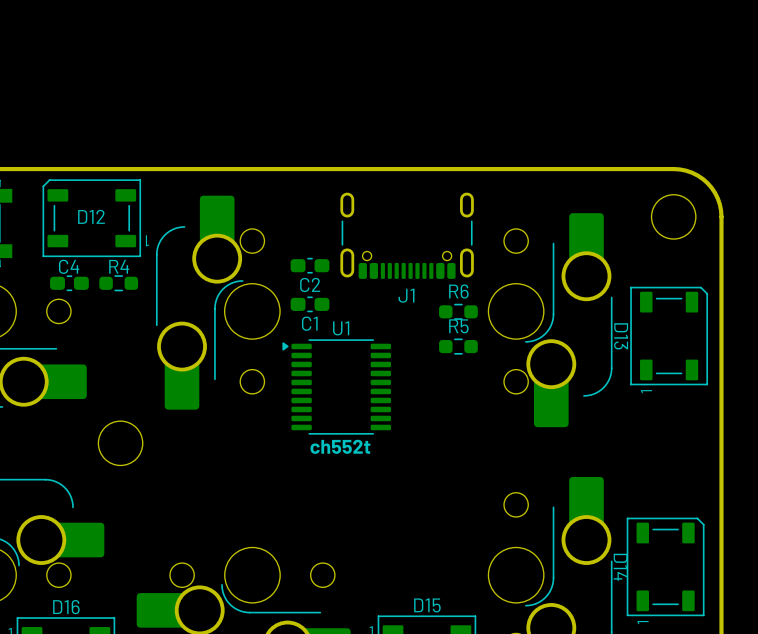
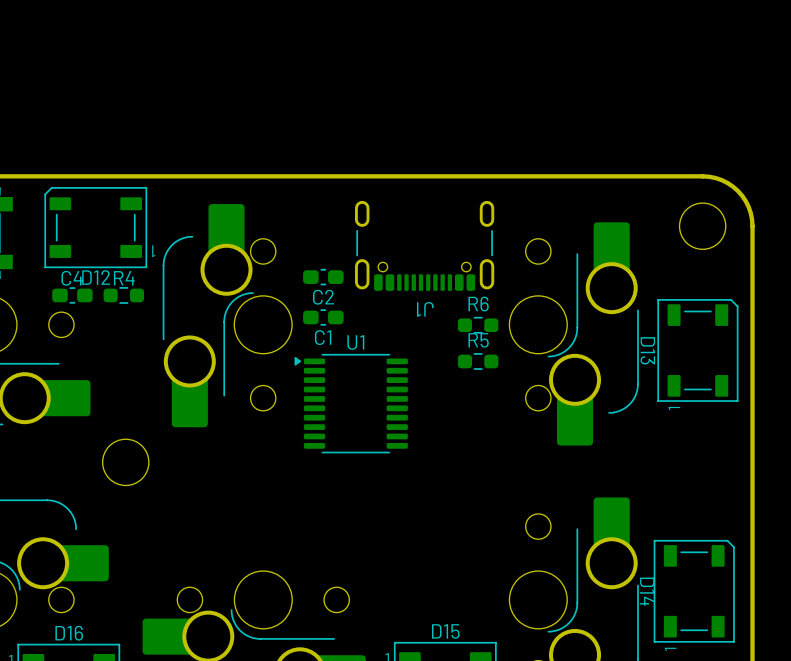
D12 name position: D12 (91, 216) -> D12 (96, 277)
J1 name rotation: 0° (406, 295) -> 180° (425, 309)
text: ch552t (340, 446) -> none

